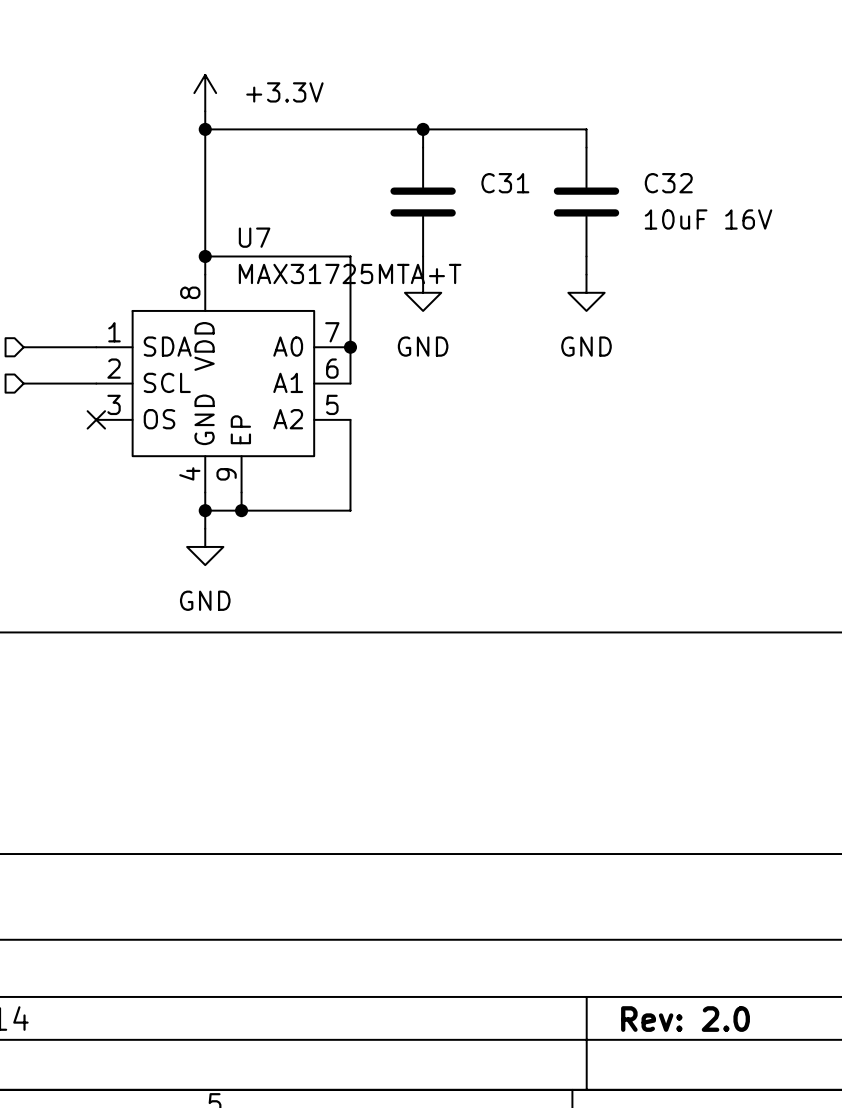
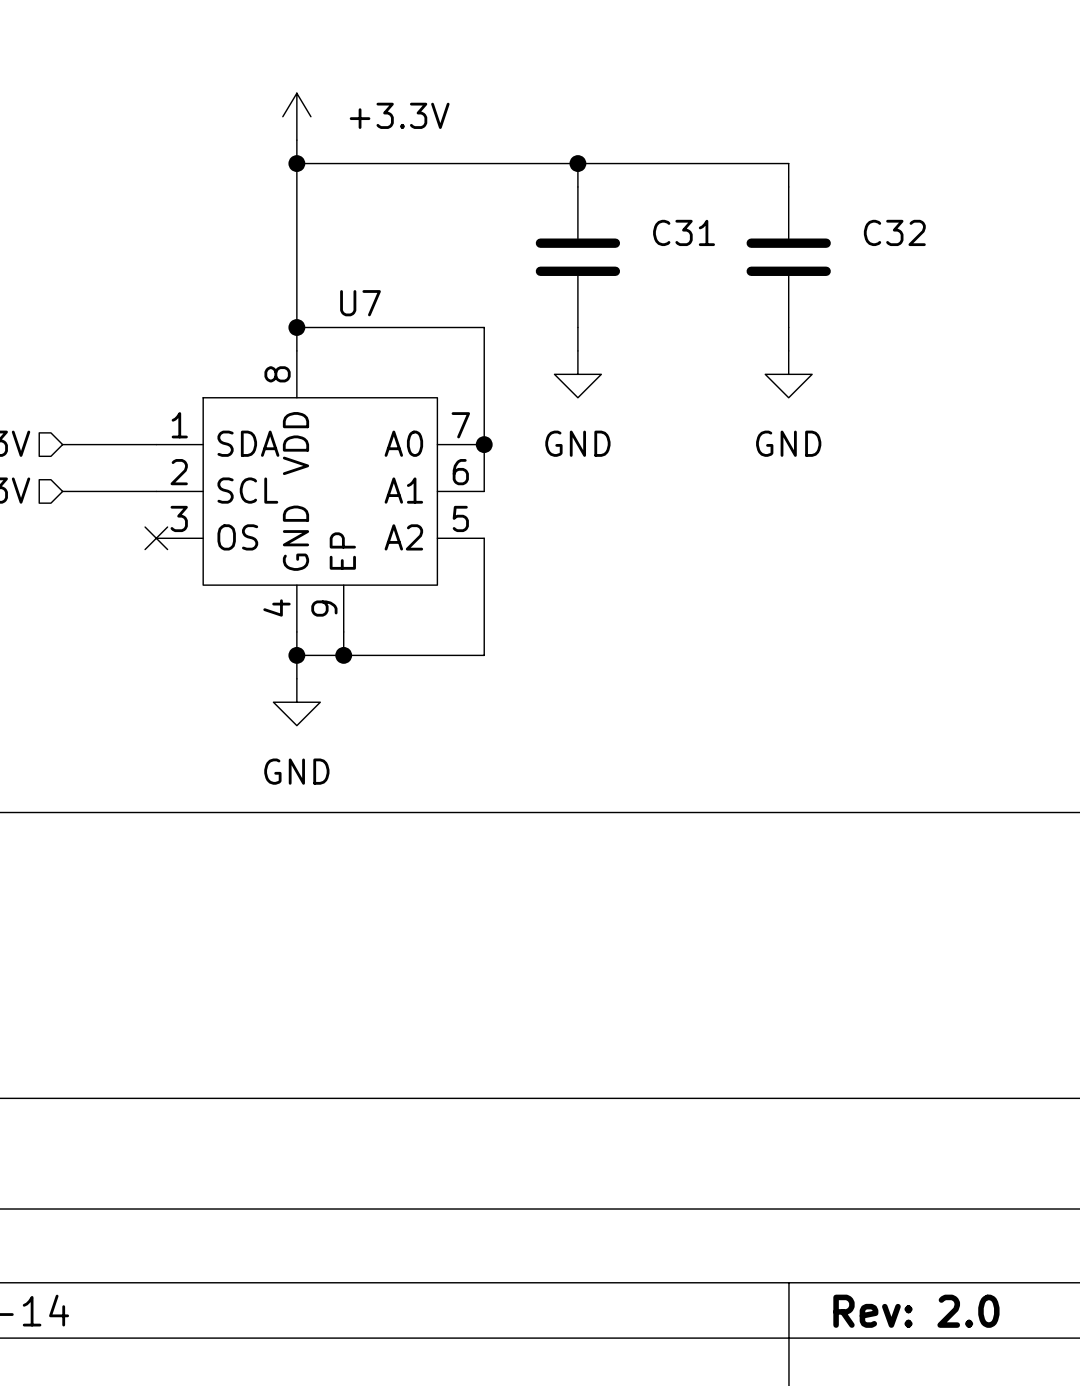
C32 value: 10uF 16V (708, 219) -> none
U7 value: MAX31725MTA+T (350, 273) -> none

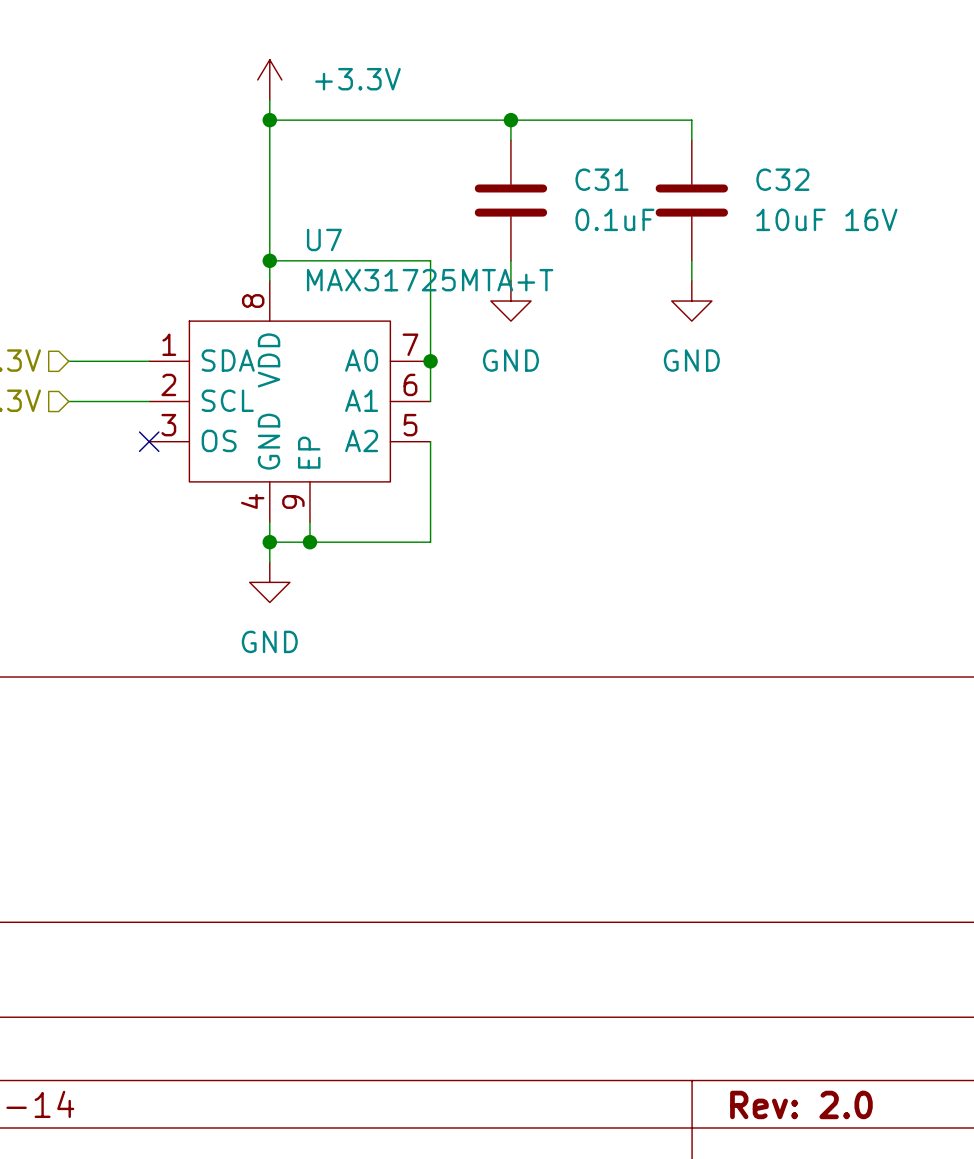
C31 value: none -> 0.1uF (614, 219)
C32 value: none -> 10uF 16V (826, 219)
U7 value: none -> MAX31725MTA+T (430, 280)

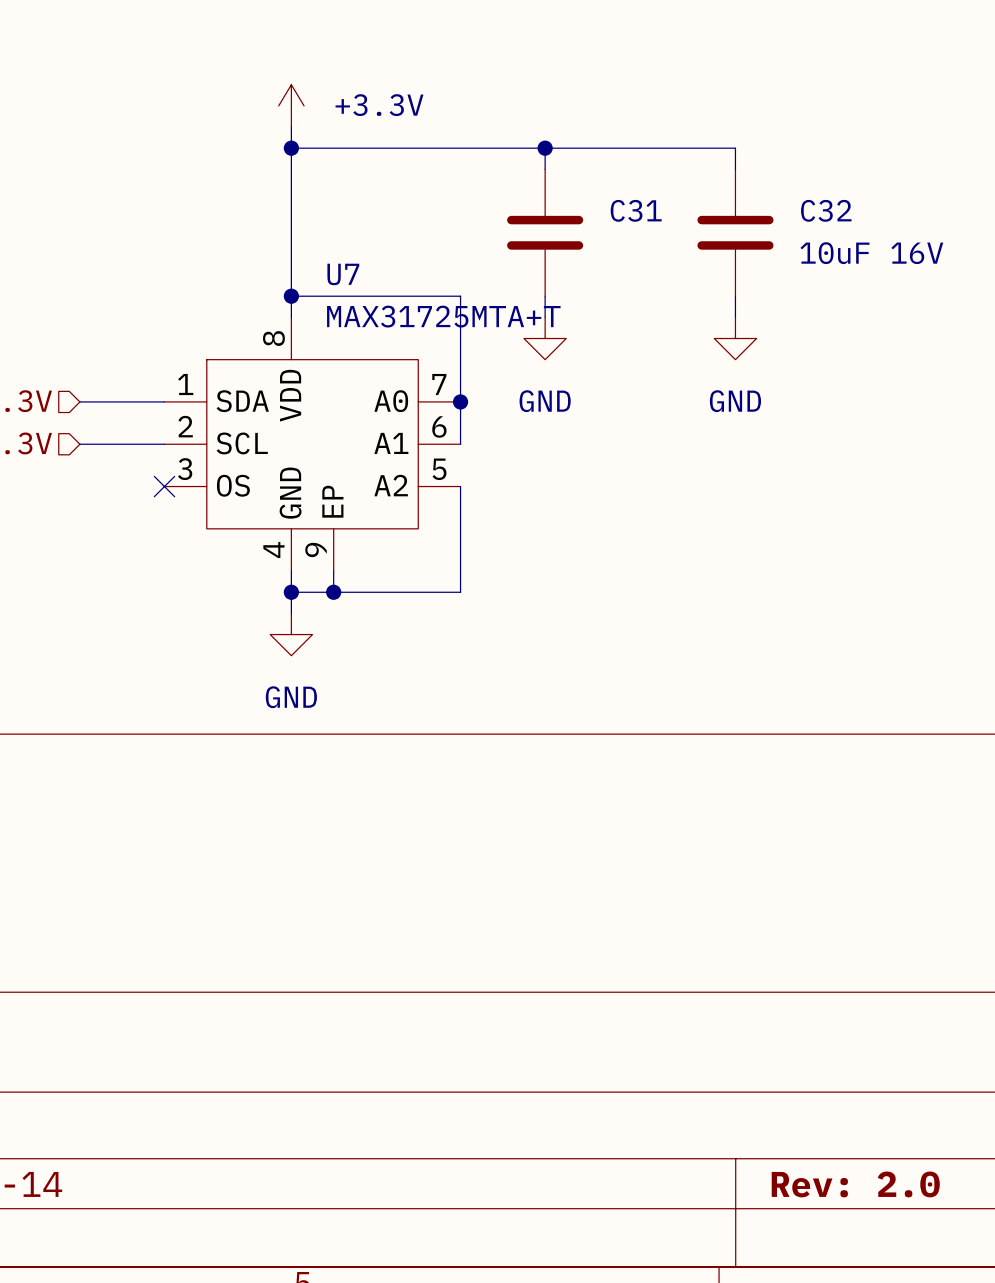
C31 value: 0.1uF (614, 219) -> none

